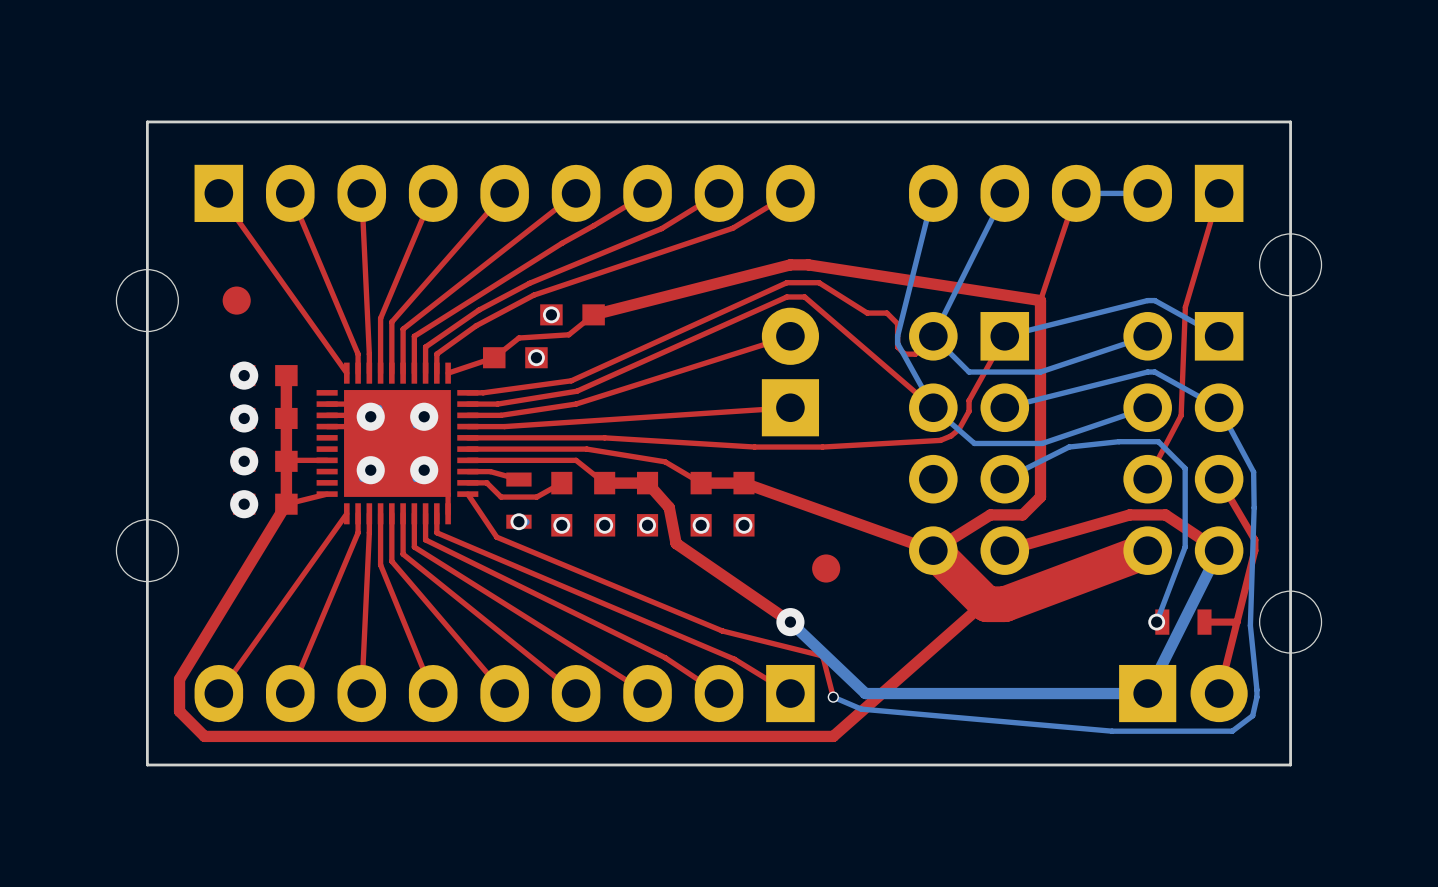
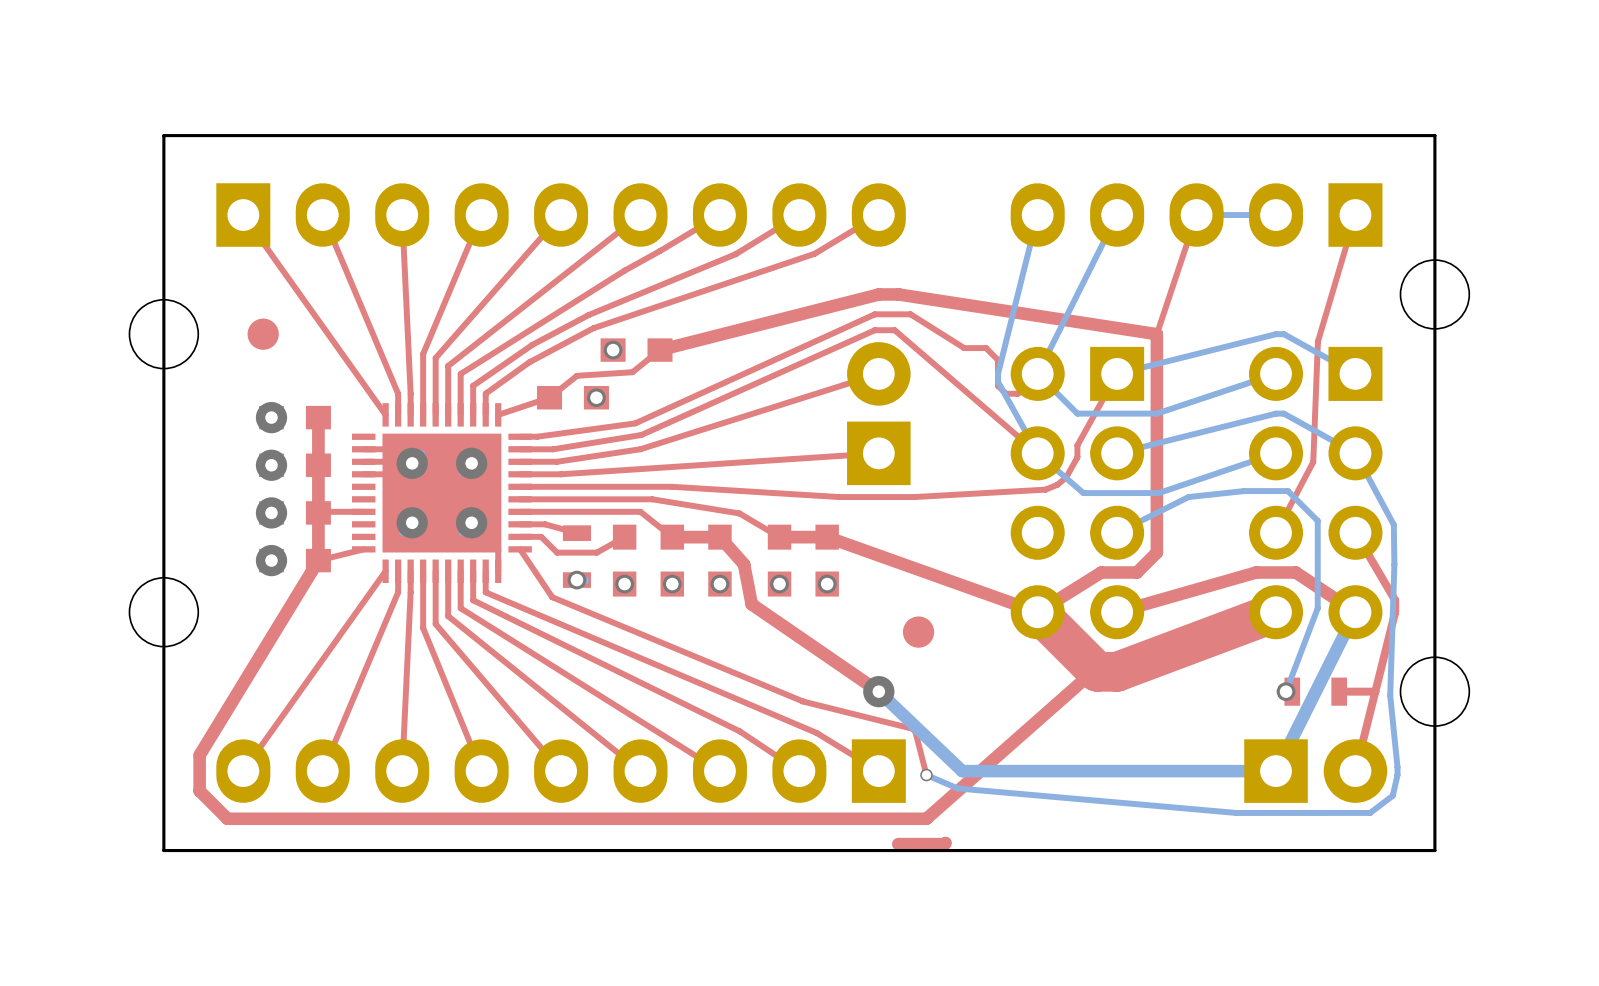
top track: none -> (945, 842) (898, 844)

